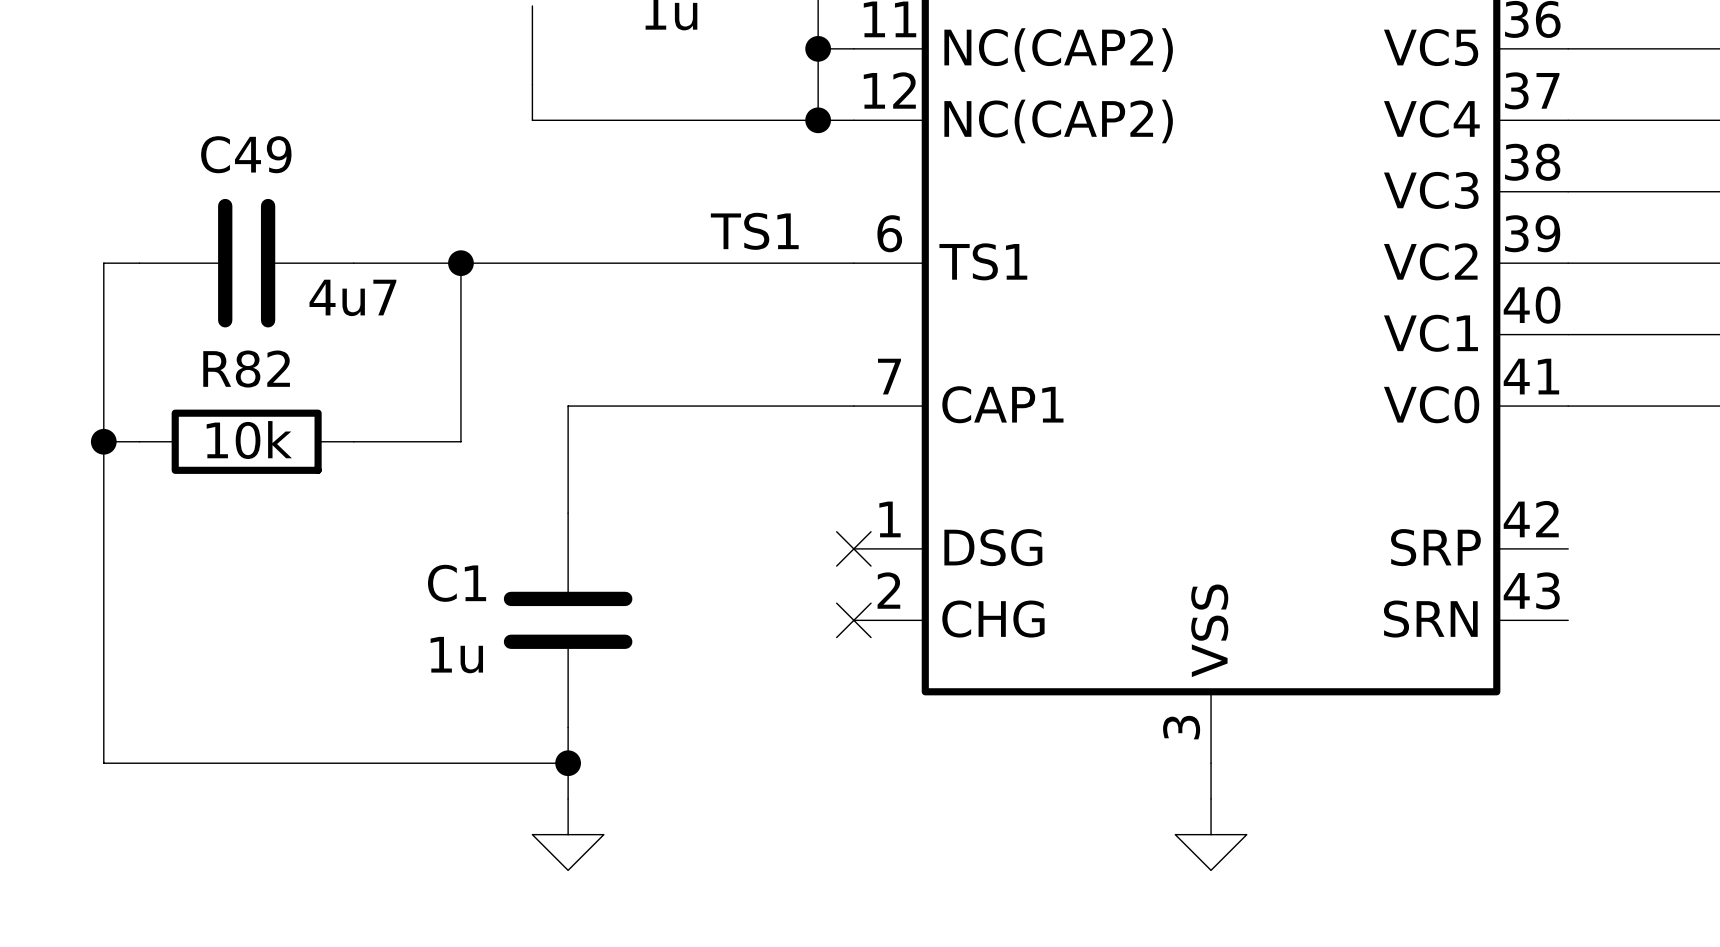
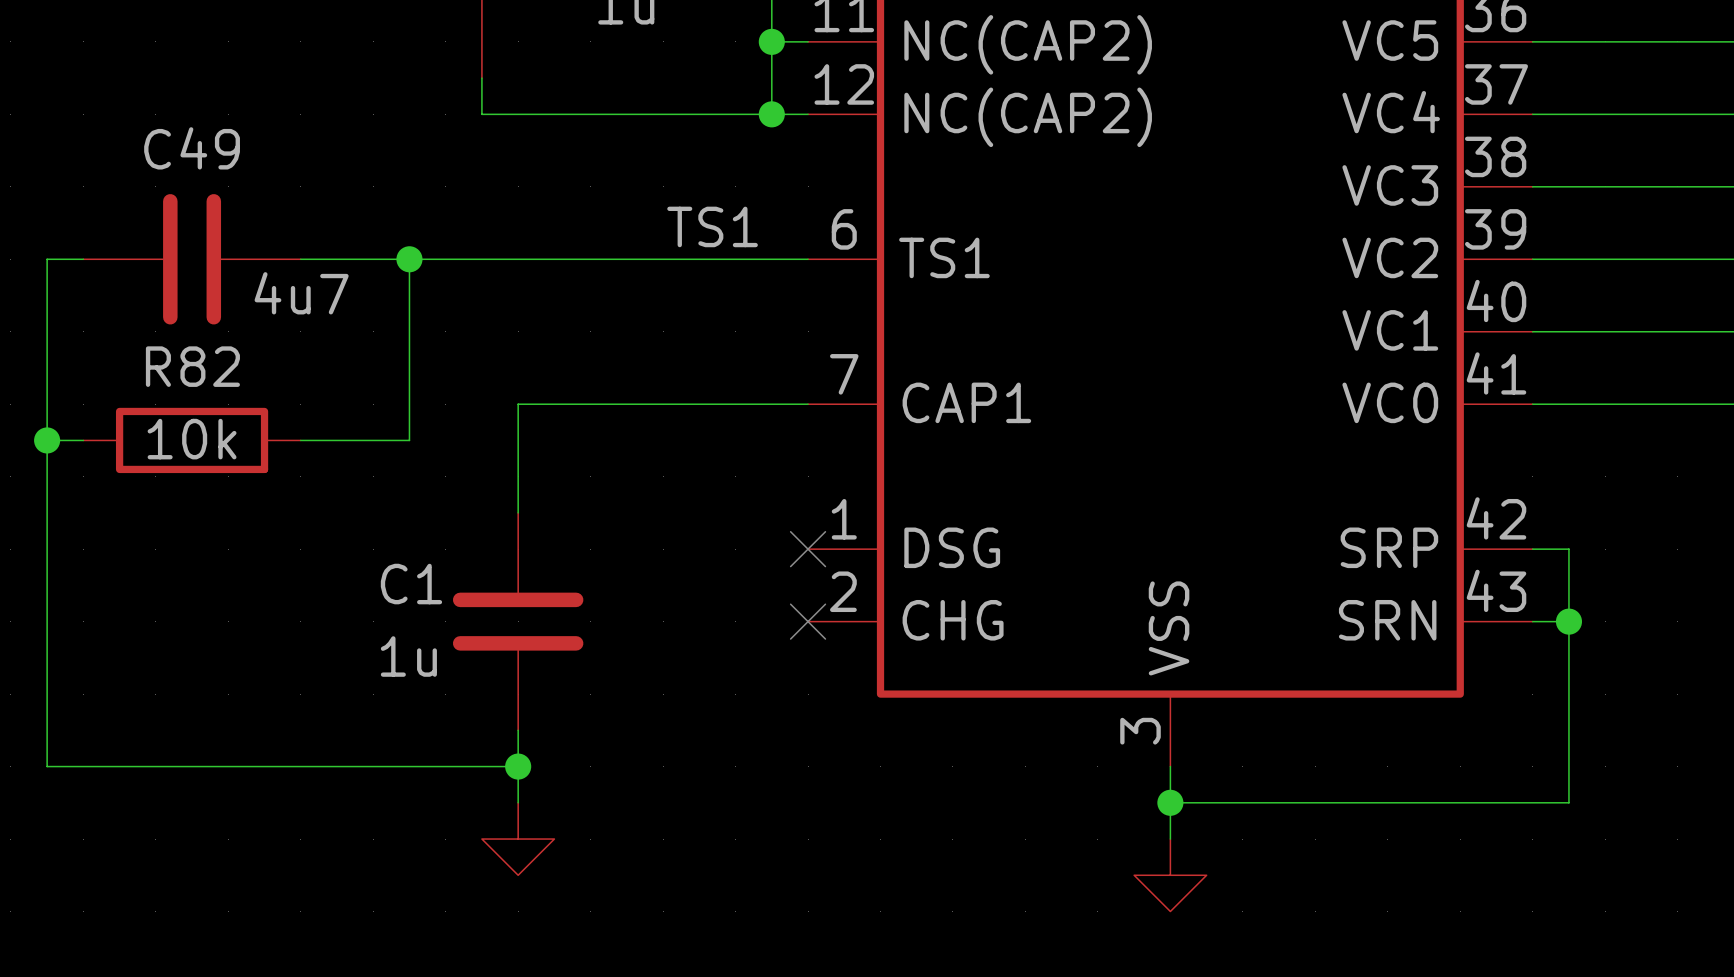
wire: none -> (1532, 549) (1568, 549) (1568, 802) (1170, 802) (1170, 839)
wire: none -> (1532, 621) (1568, 621)
junction: none -> (1568, 621)
junction: none -> (1170, 802)
power symbol position: (1211, 834) -> (1170, 875)

